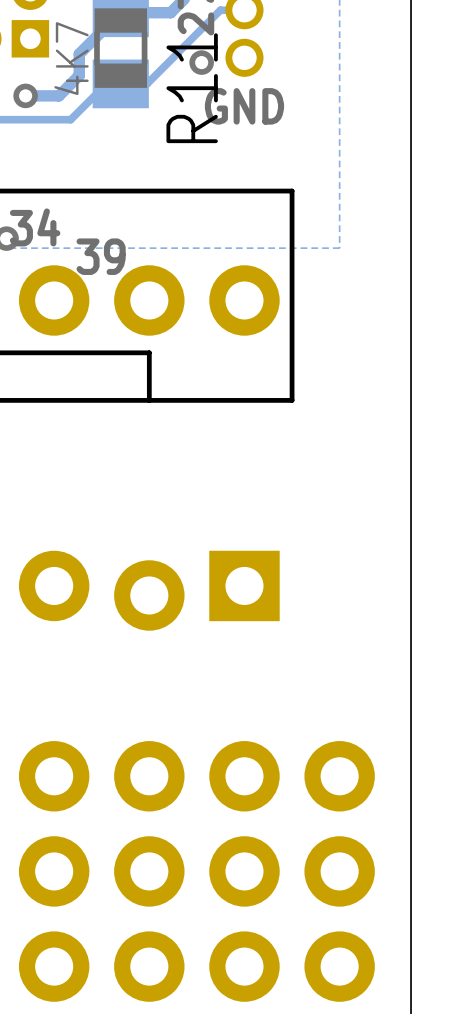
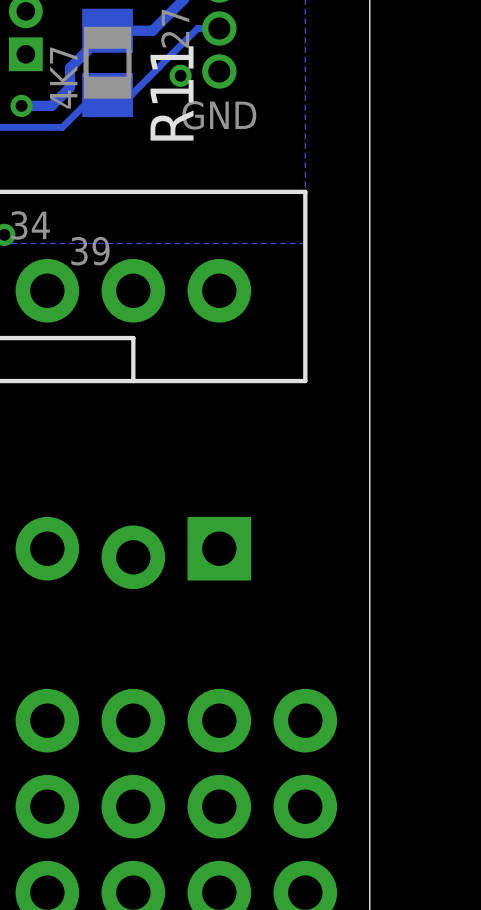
line: (292, 191) (292, 400) -> (262, 191) (305, 191) (305, 381) (262, 381)

